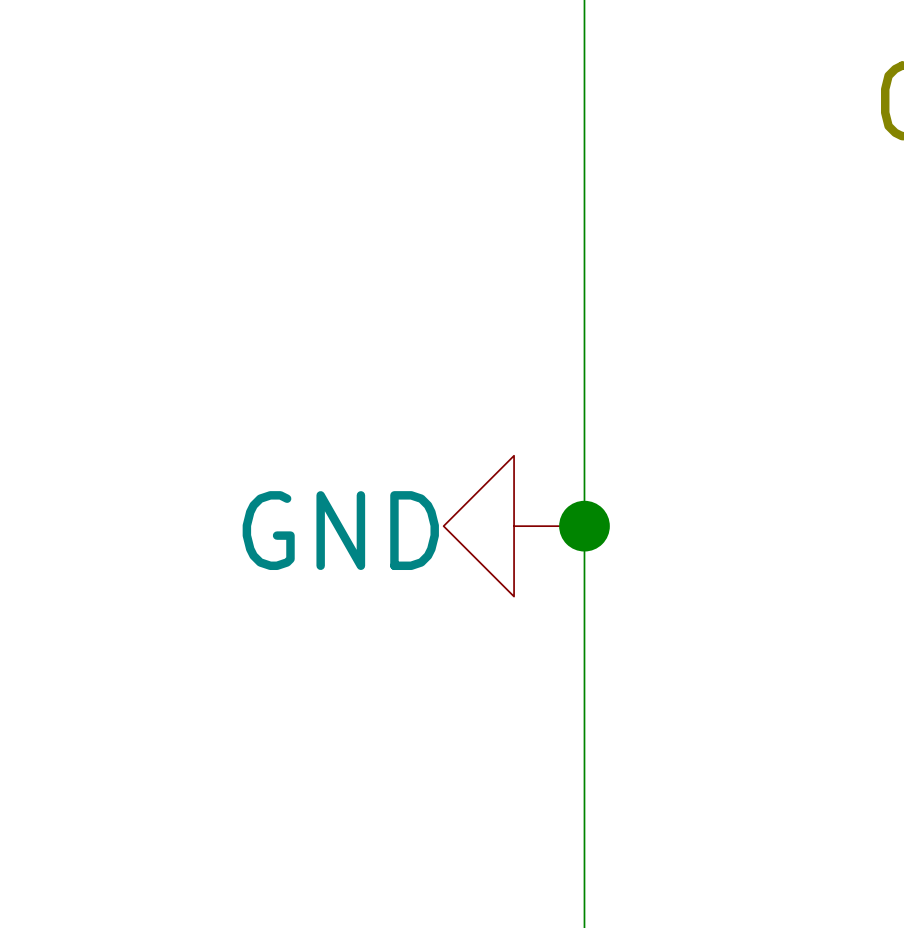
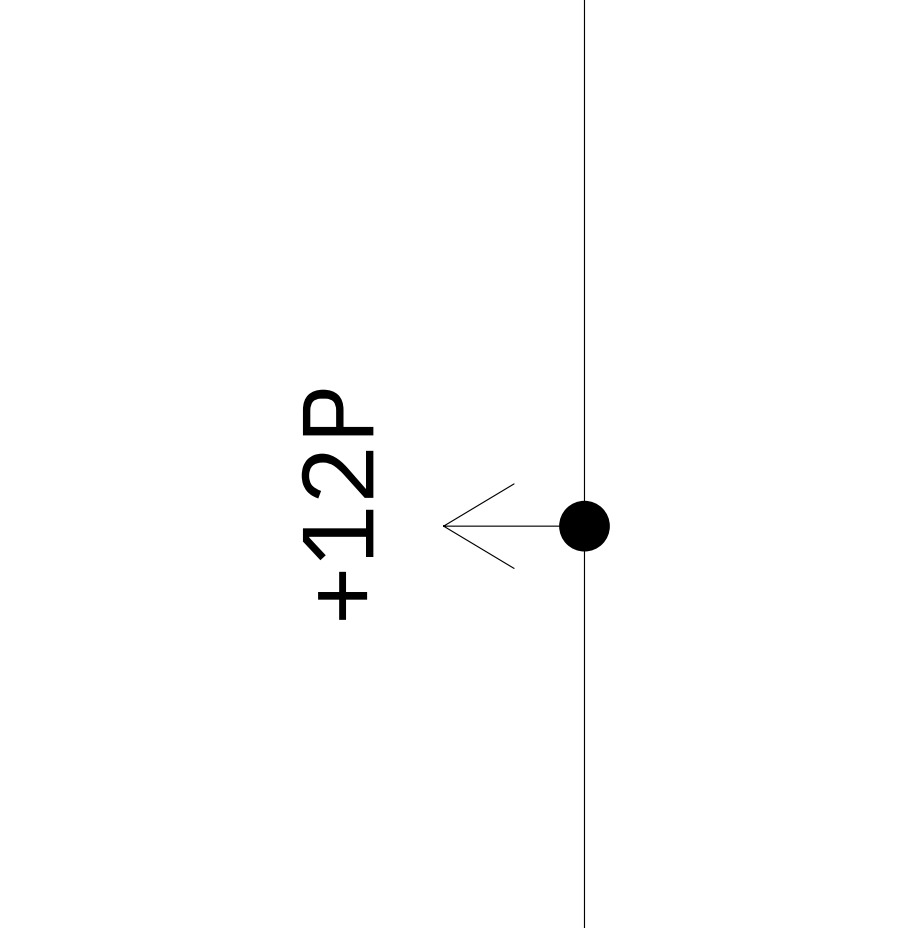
power symbol: GND (514, 526) -> +12P (514, 526)

